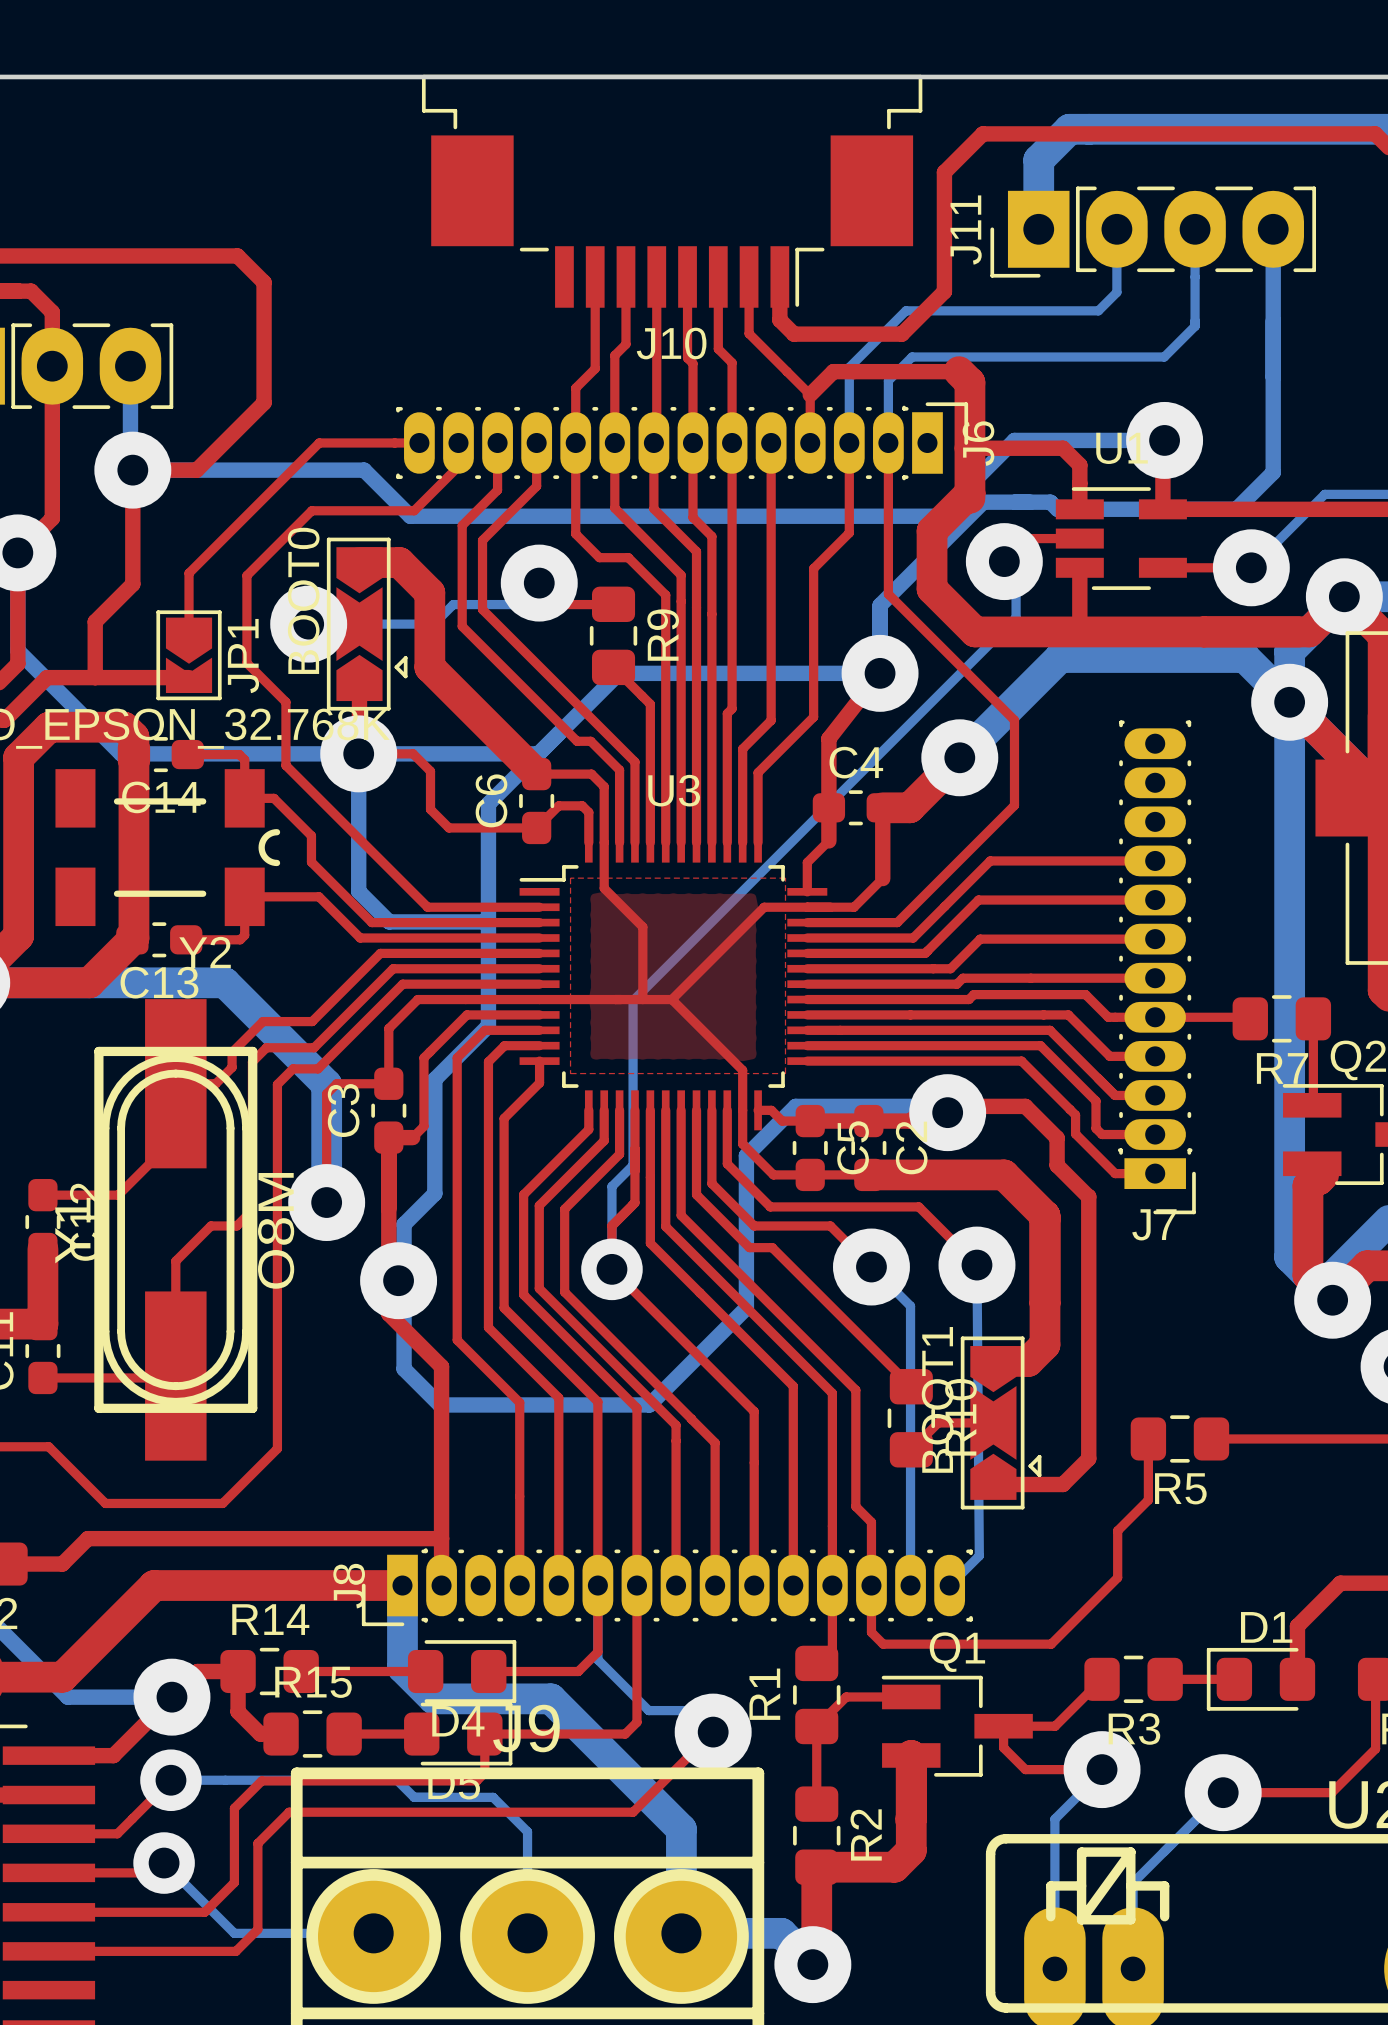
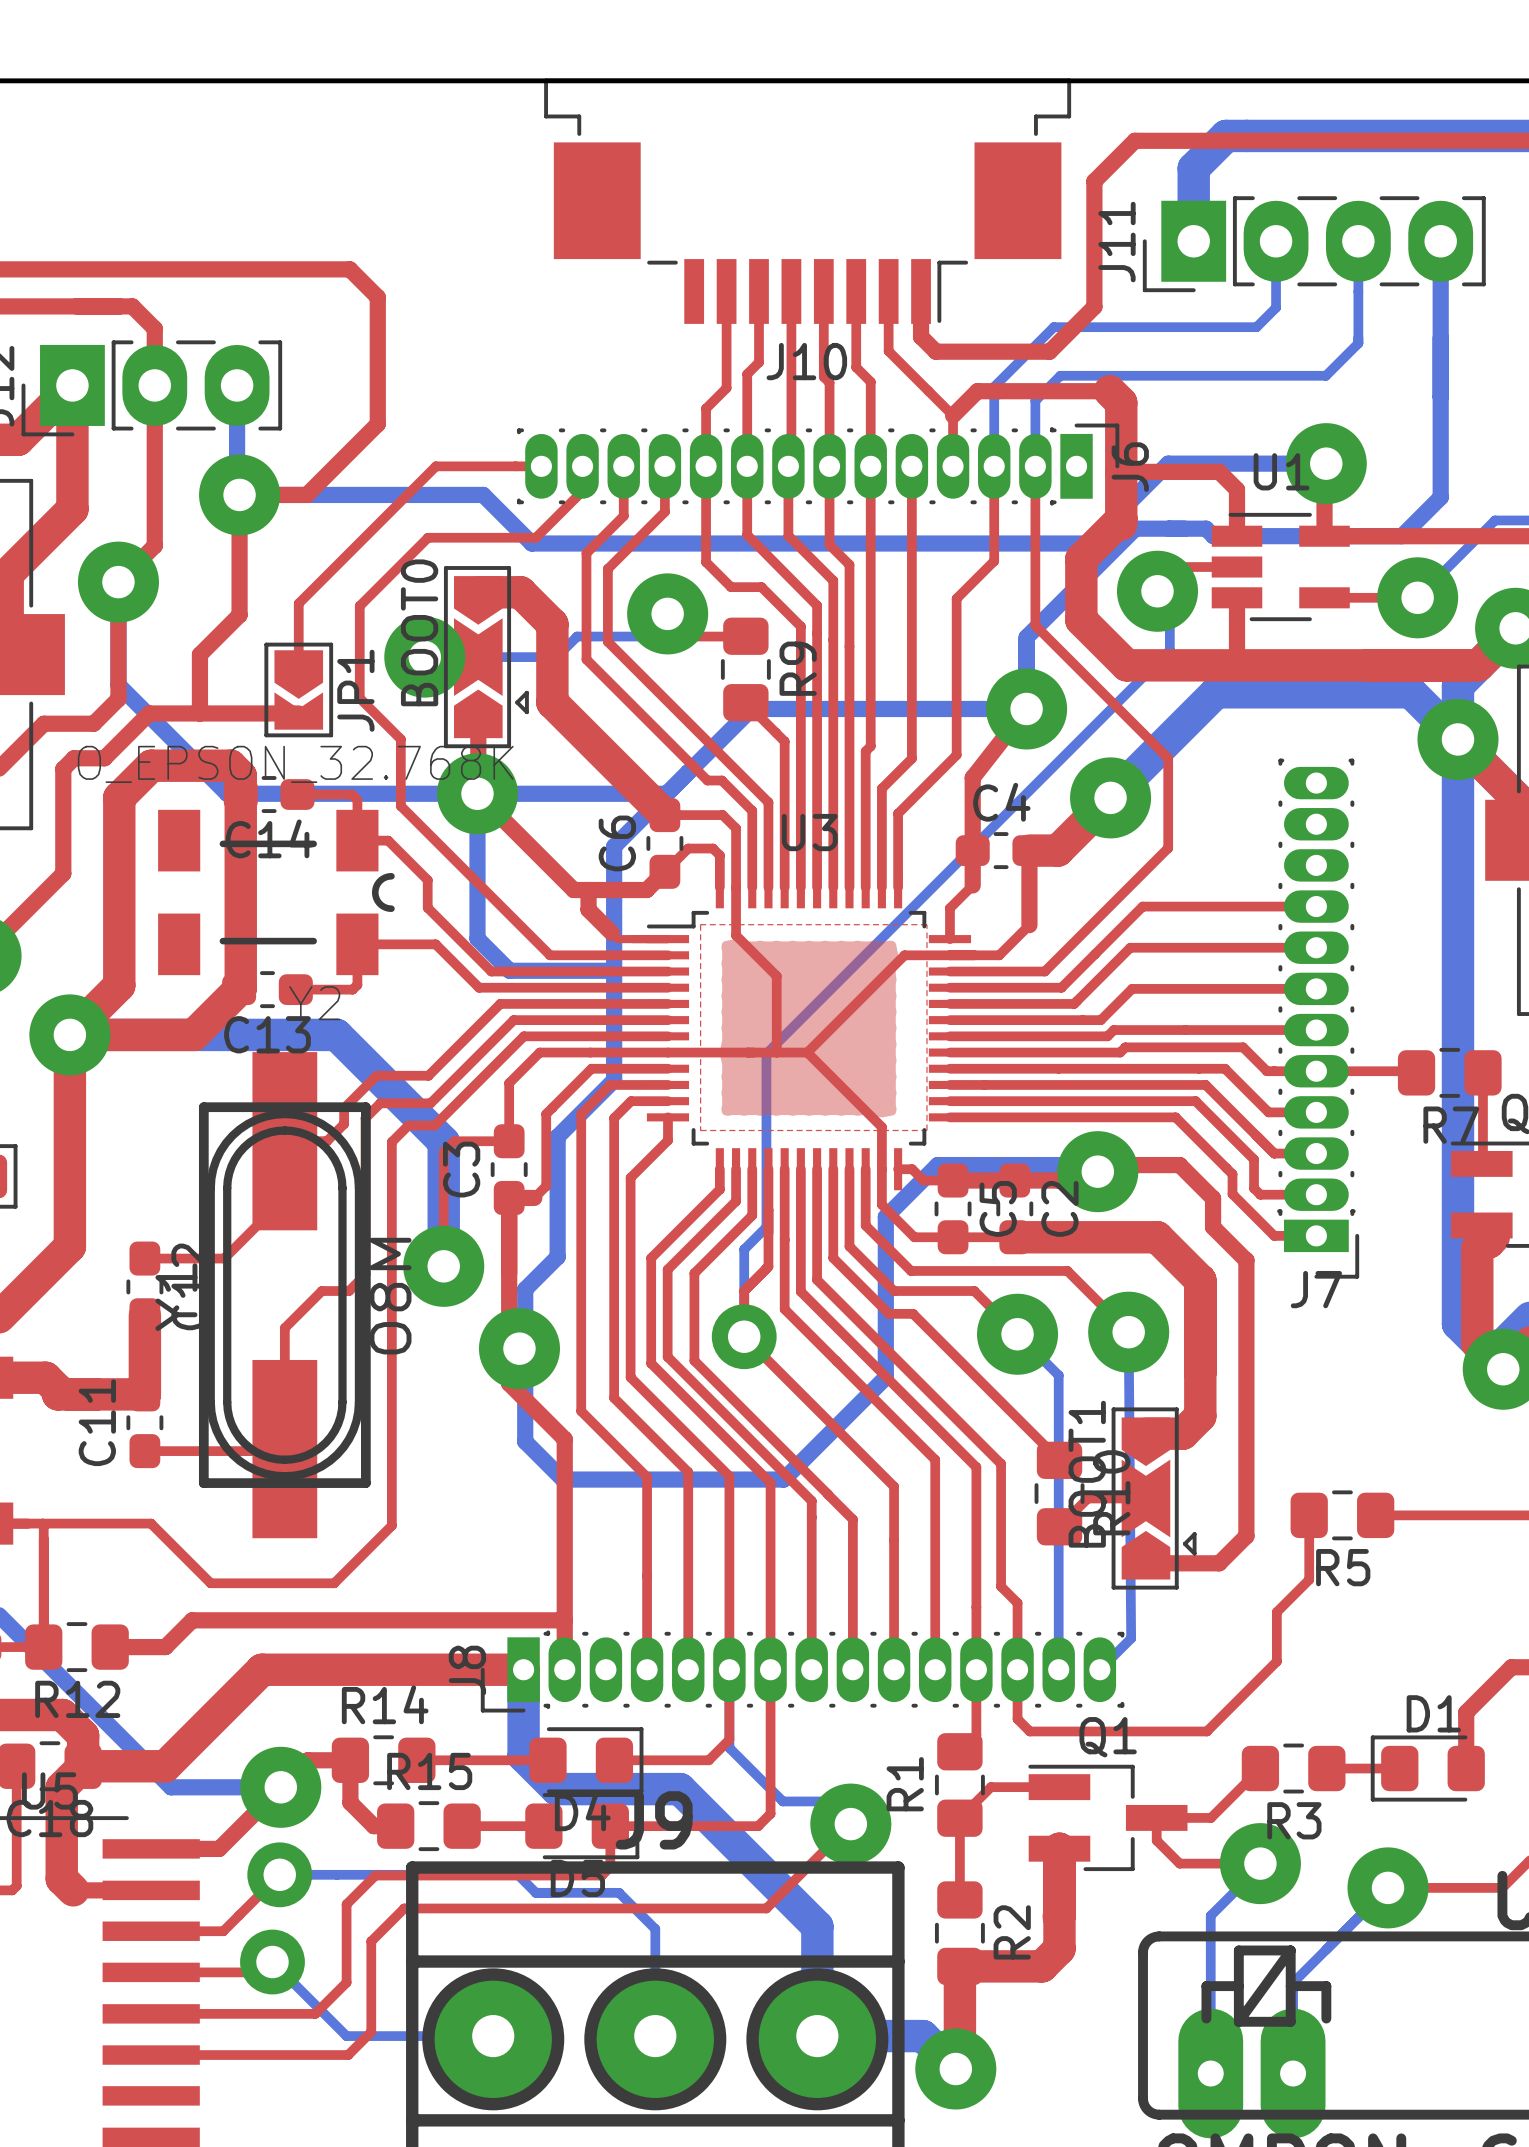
top track: (358, 753) (413, 753) (430, 771) (430, 809) (448, 827) (536, 827) -> (477, 793) (573, 890) (646, 890) (664, 871)
top track: none -> (588, 890) (588, 909) (617, 939) (667, 939)

